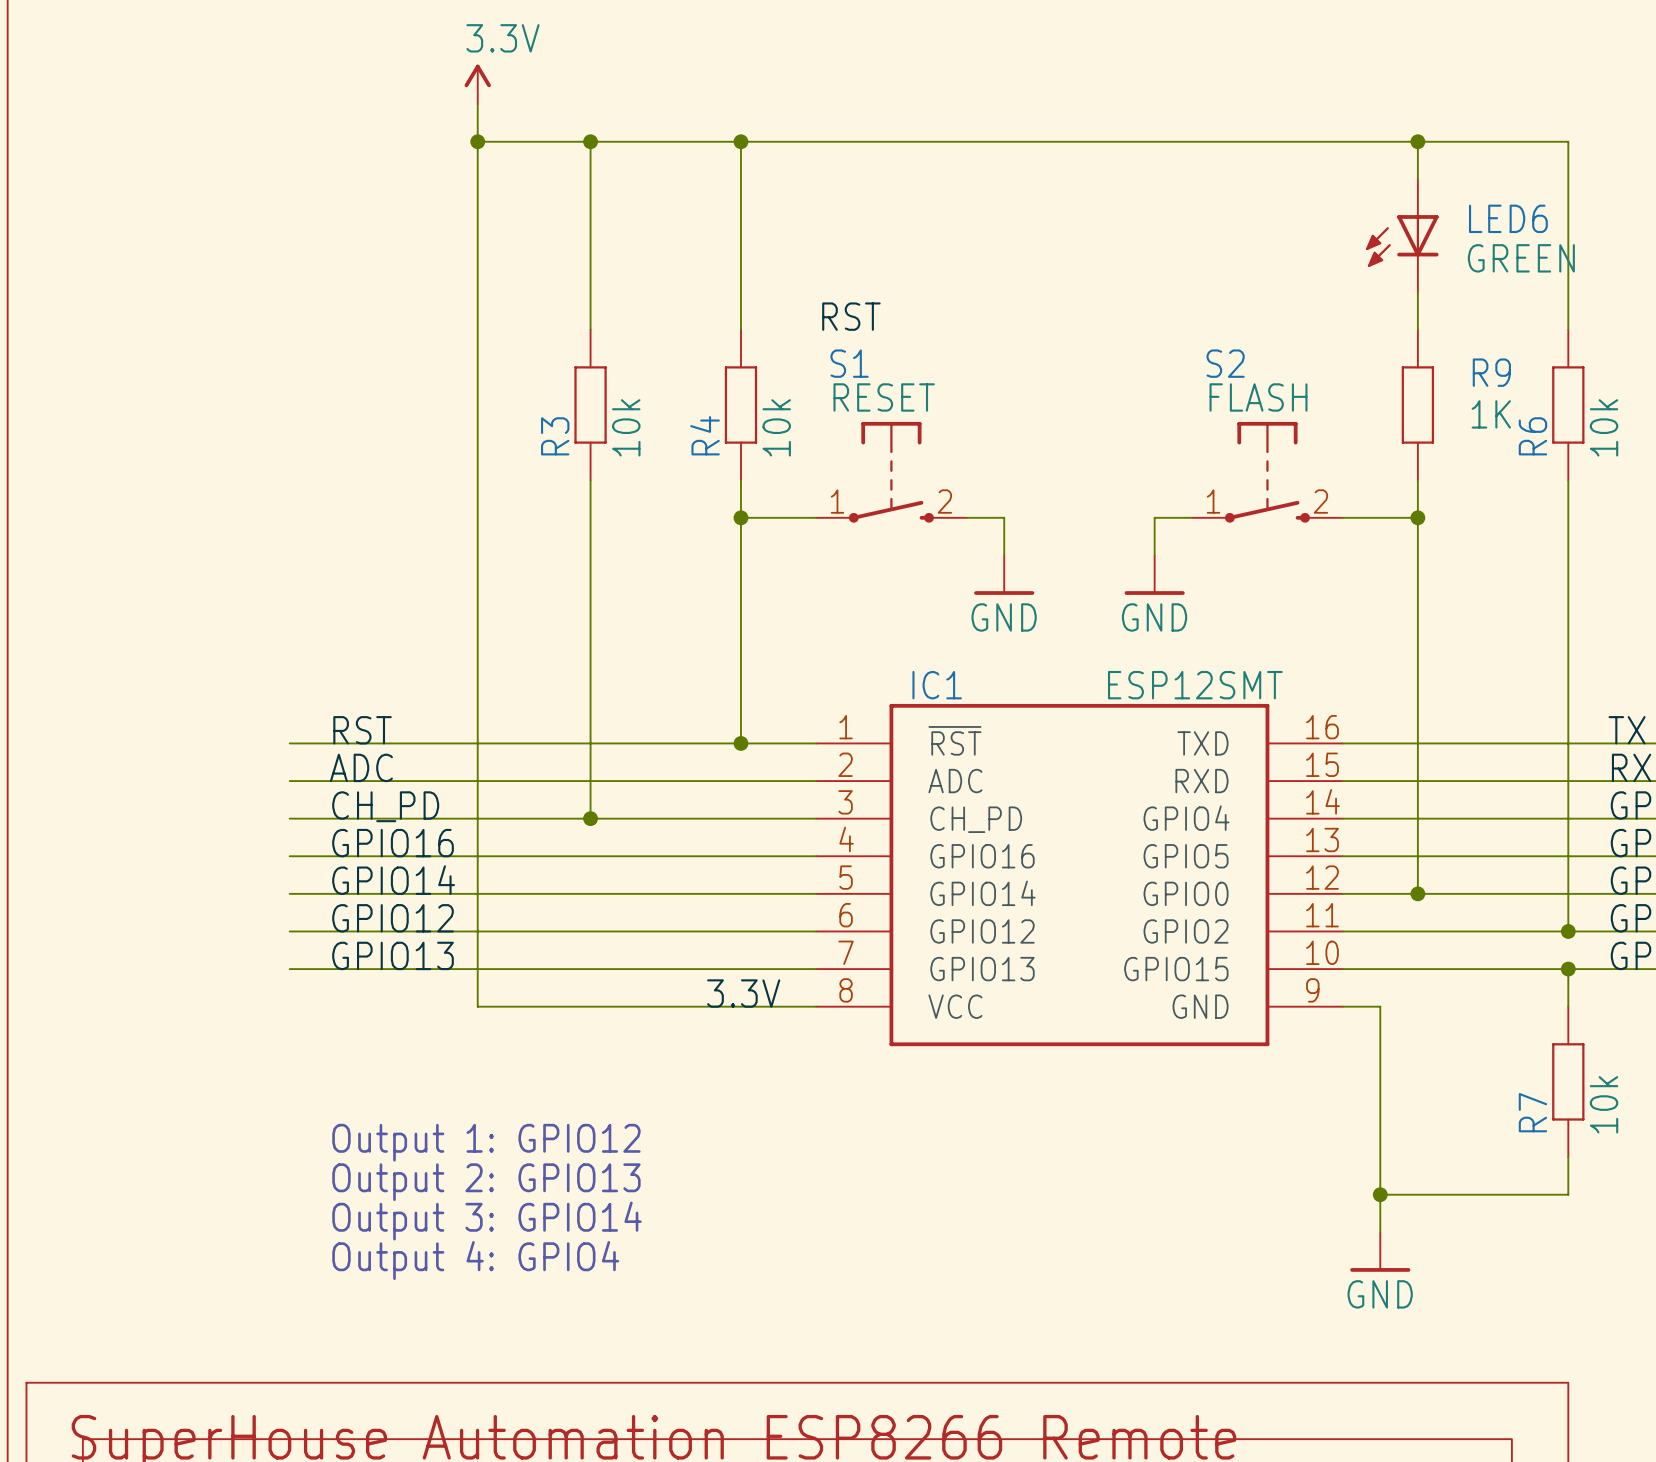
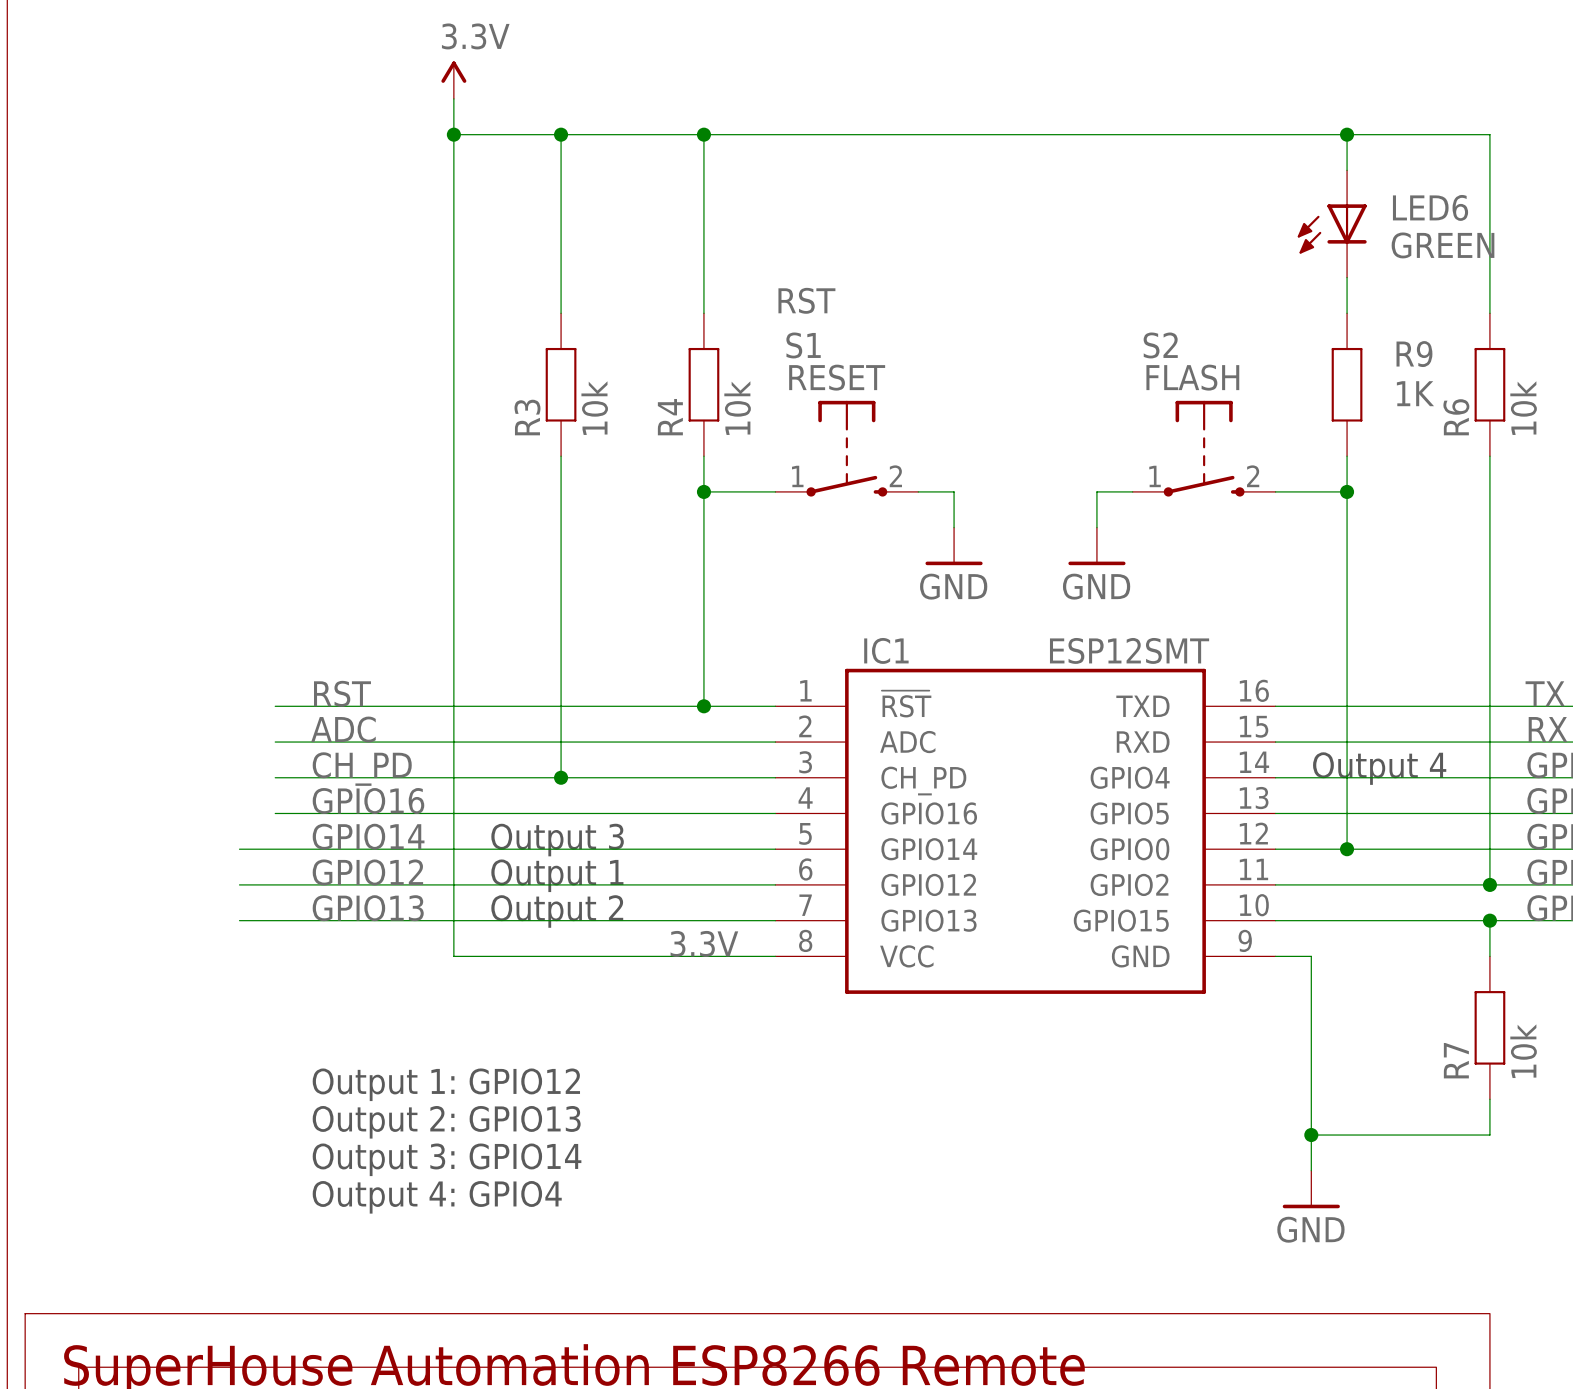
text: none -> Output 4 (1379, 768)
text: none -> Output 3 (557, 840)
wire: none -> (239, 849) (275, 849)
text: none -> Output 1 (557, 875)
wire: none -> (239, 884) (275, 884)
text: none -> Output 2 (557, 911)
wire: none -> (239, 920) (275, 920)

